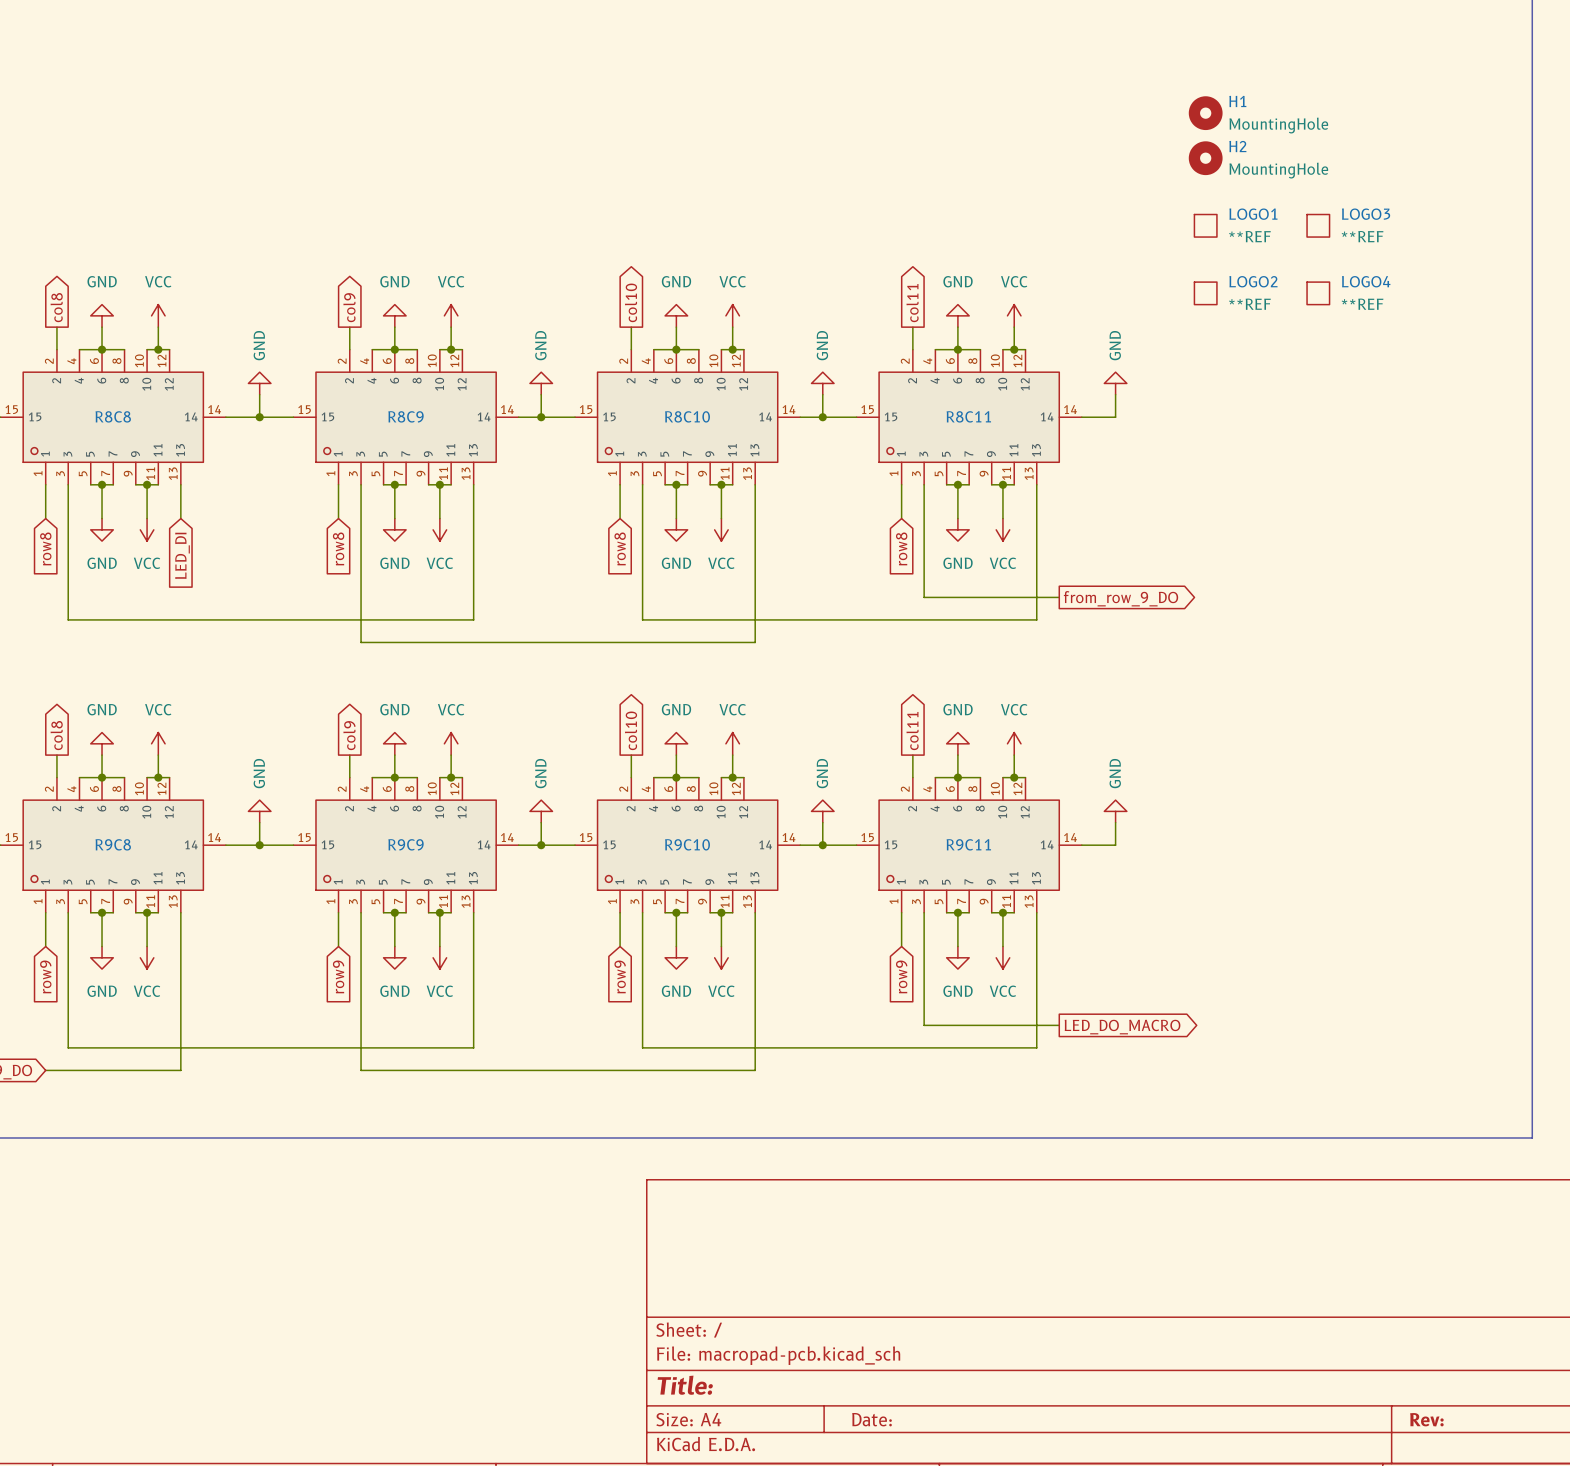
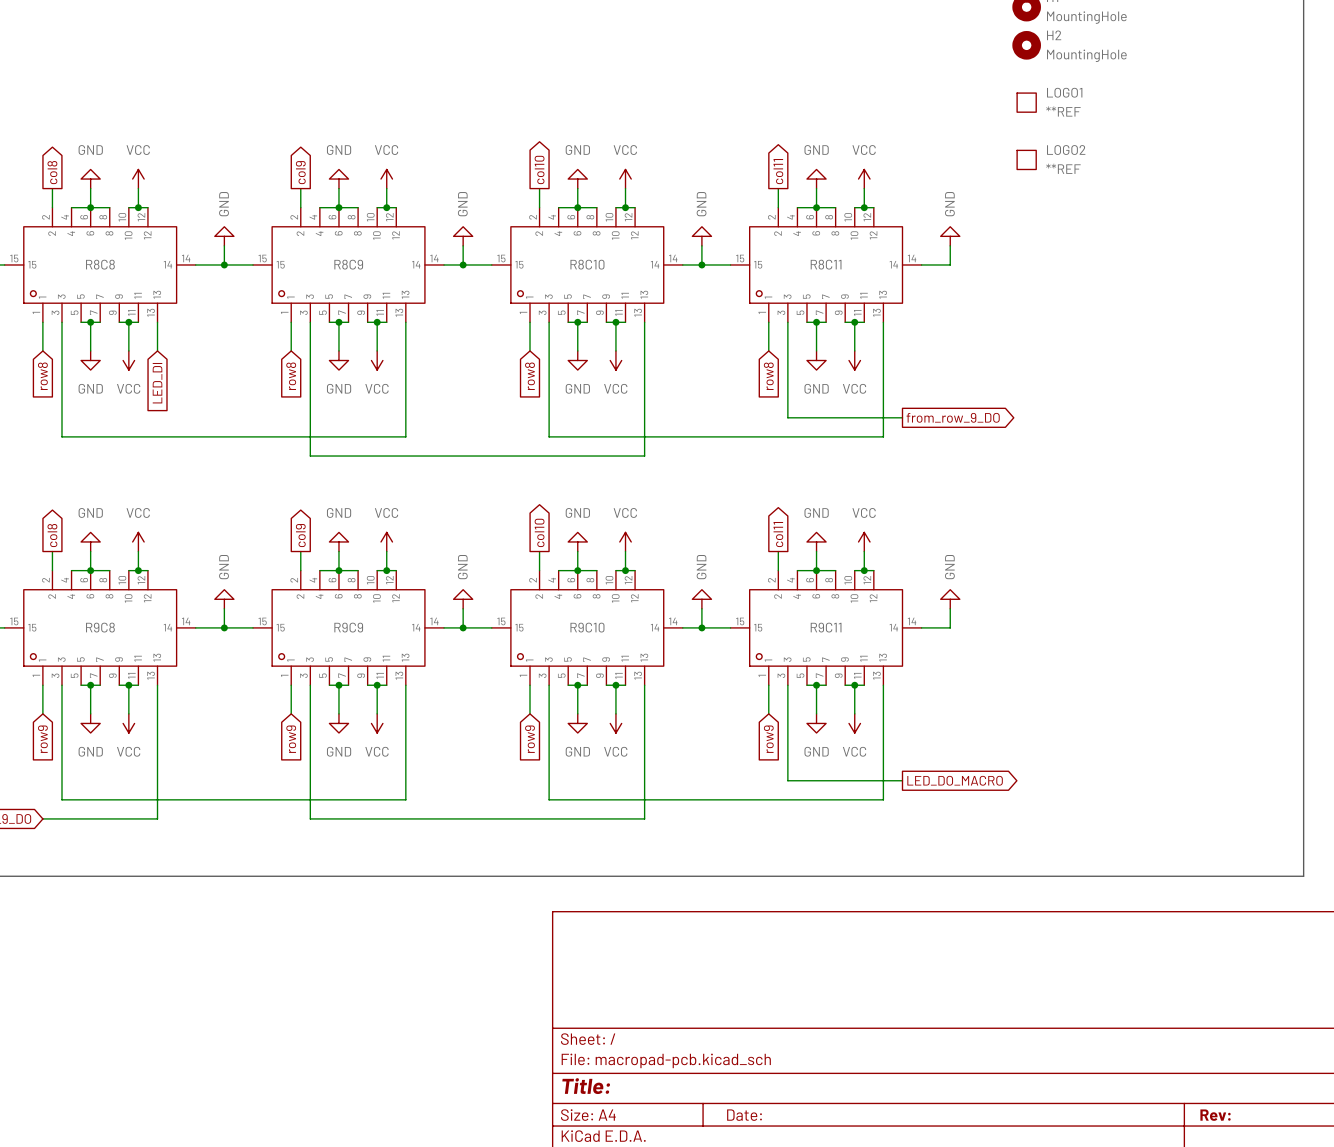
LOGO3: **REF (1318, 225) -> none
LOGO4: **REF (1318, 293) -> none

